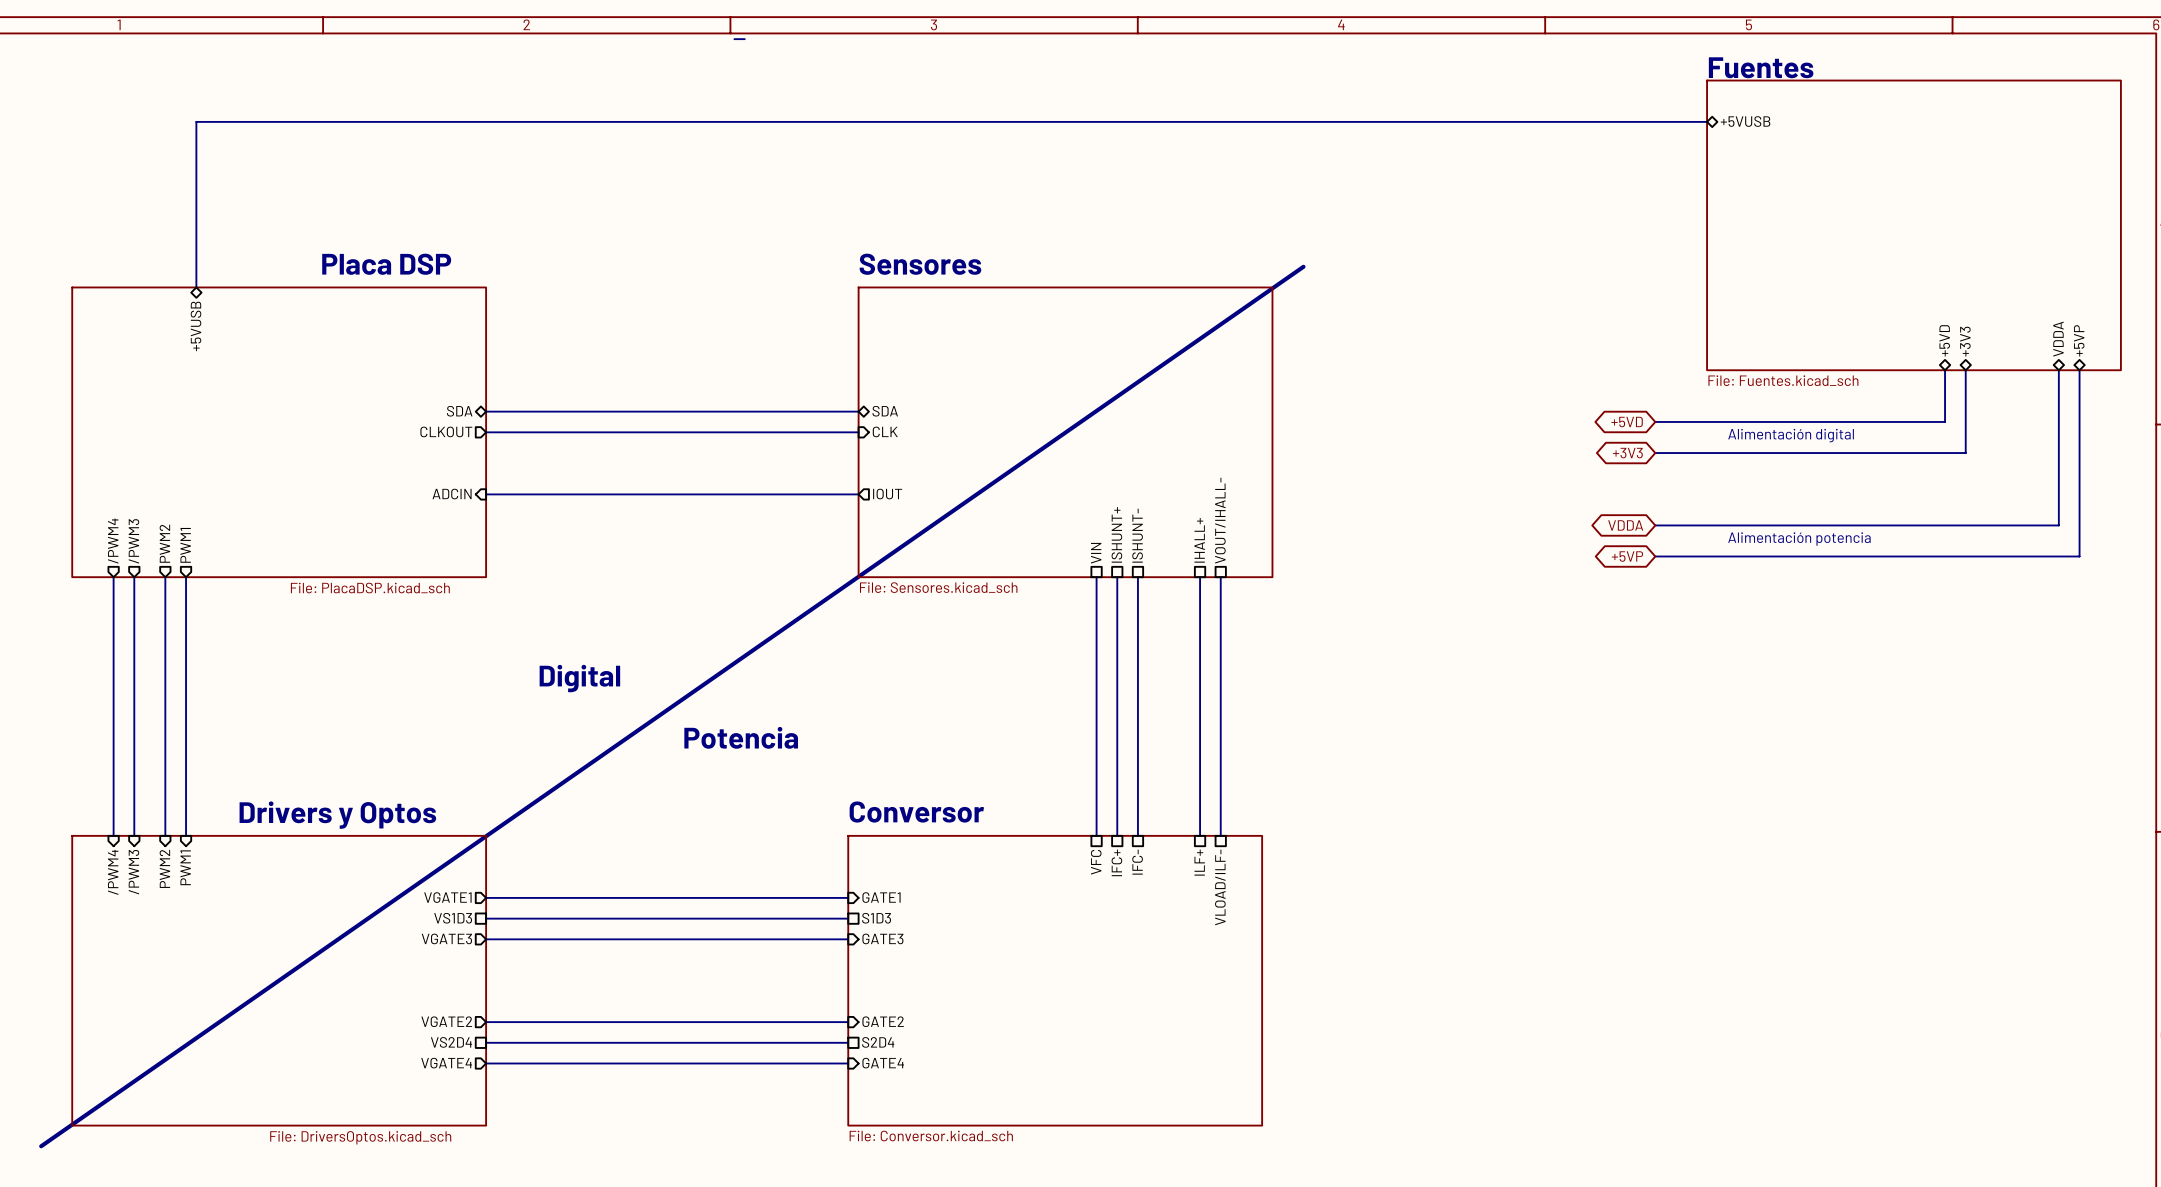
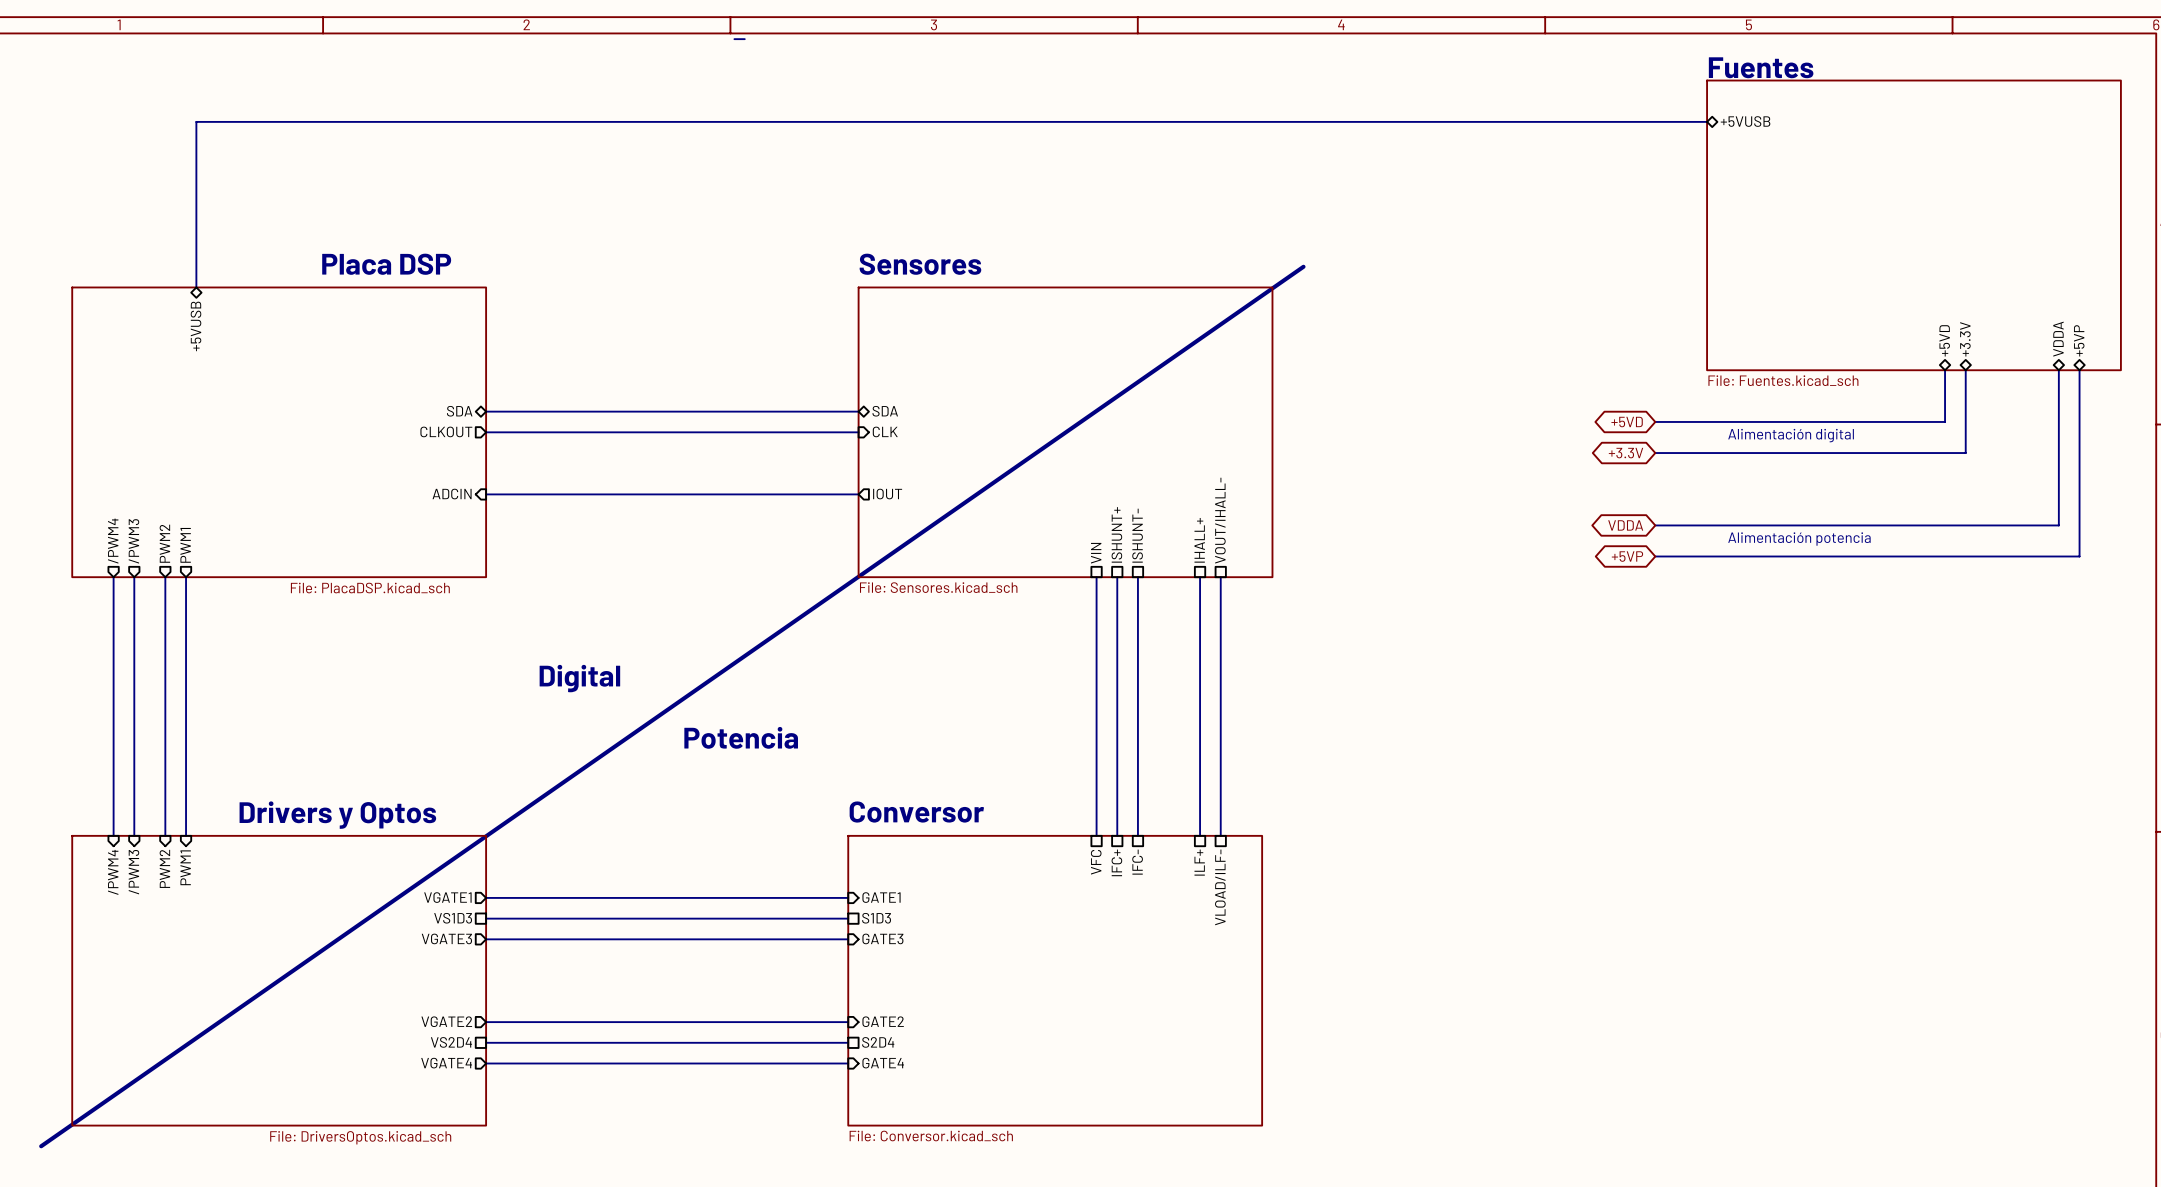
sheet pin: +3V3 (1965, 341) -> +3.3V (1965, 339)
global label: +3V3 (1627, 453) -> +3.3V (1626, 453)

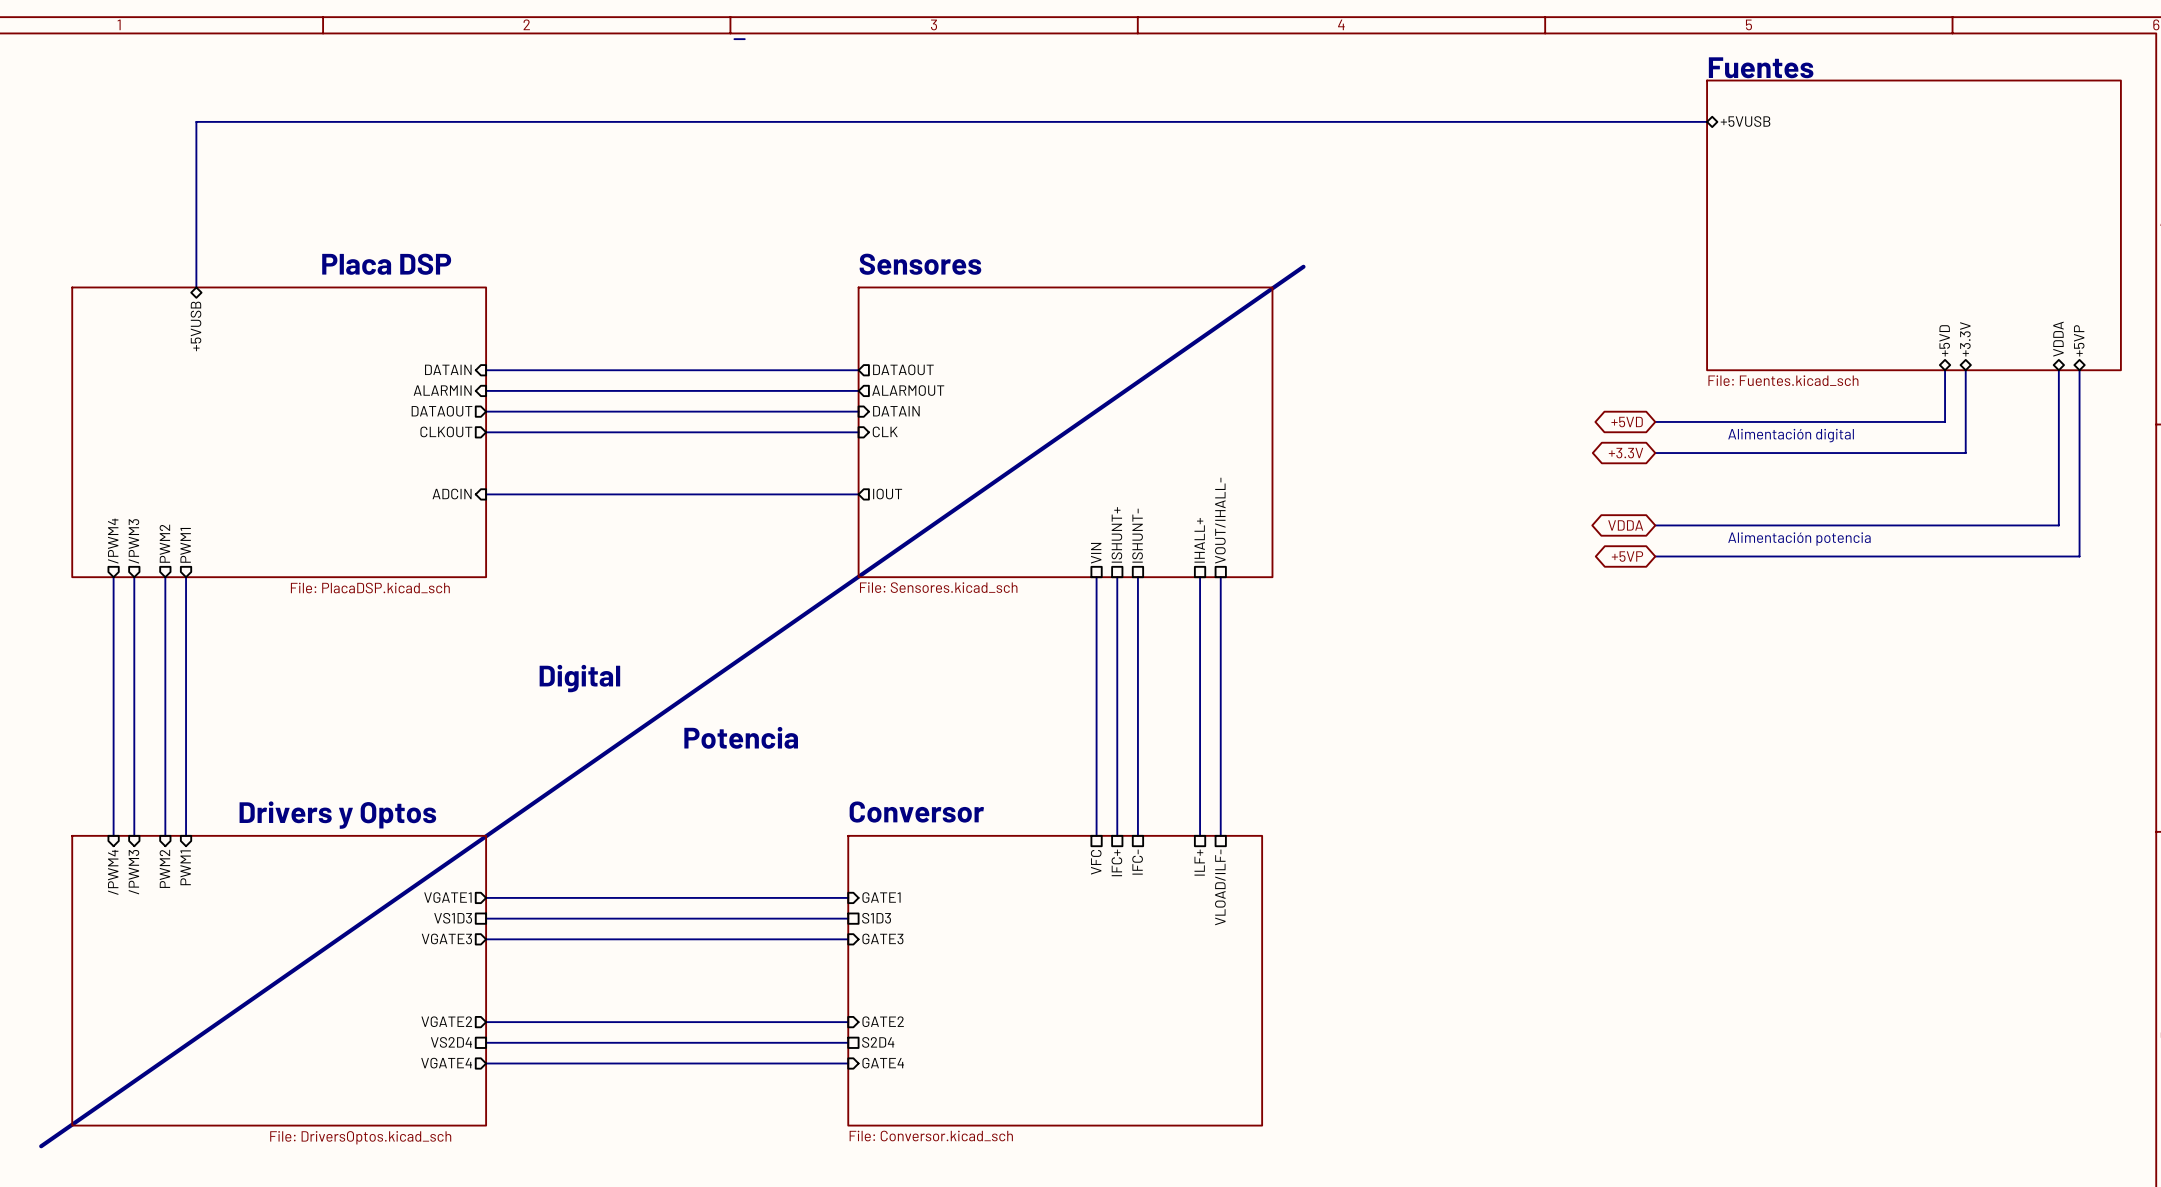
sheet pin: none -> DATAIN (448, 369)
sheet pin: none -> DATAOUT (903, 369)
wire: none -> (486, 370) (858, 370)
sheet pin: none -> ALARMIN (442, 390)
wire: none -> (486, 390) (858, 390)
sheet pin: none -> ALARMOUT (908, 390)
sheet pin shape: bidirectional (459, 411) -> output (442, 411)
sheet pin: SDA (459, 411) -> DATAOUT (442, 411)
sheet pin shape: bidirectional (885, 411) -> input (896, 411)
sheet pin: SDA (885, 411) -> DATAIN (896, 411)

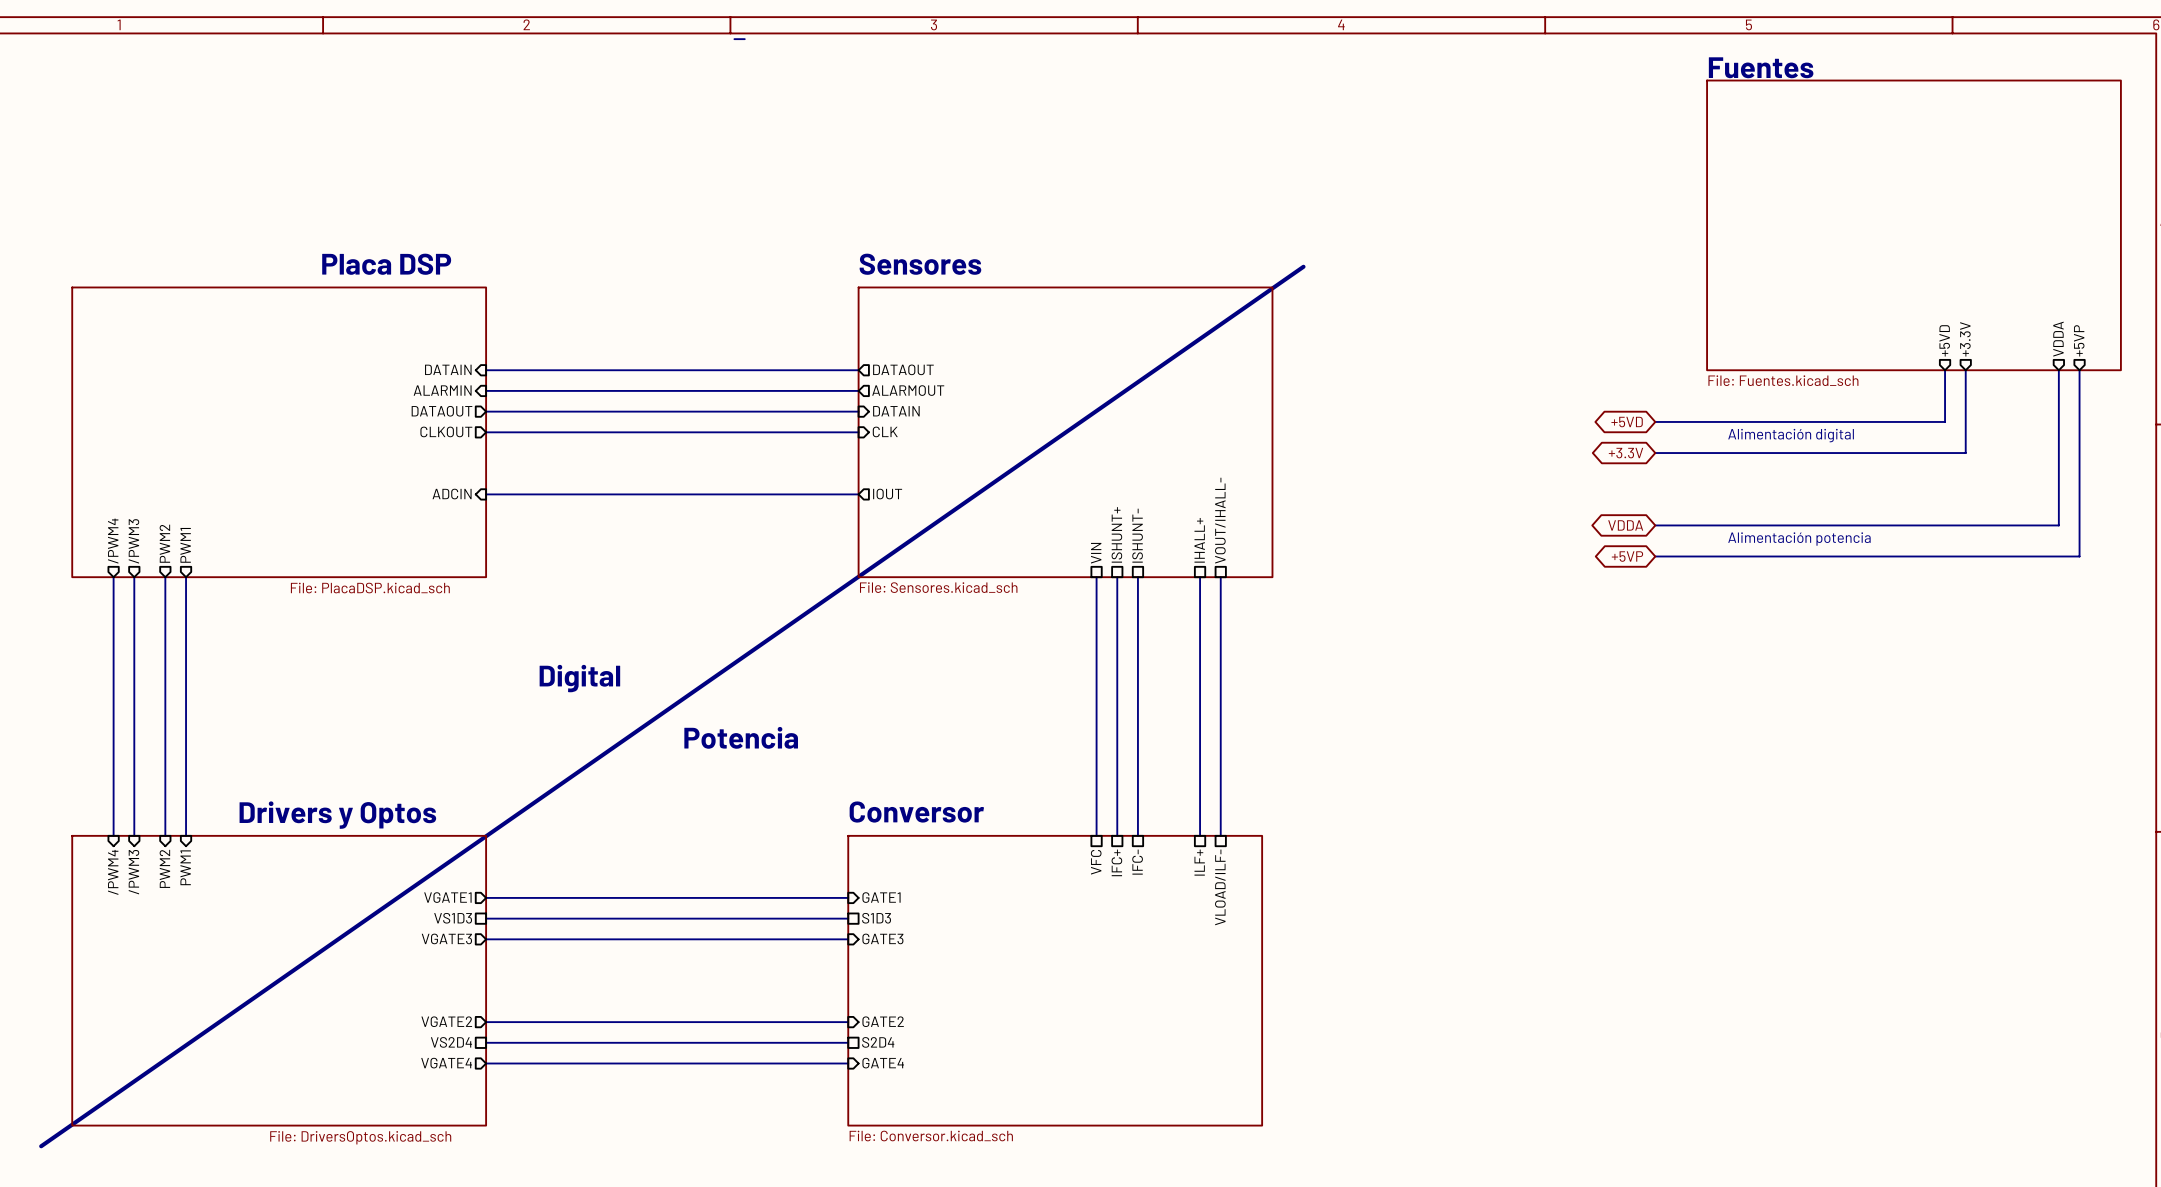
wire: (1707, 121) (196, 121) (196, 287) -> none
sheet pin: +5VUSB (1745, 121) -> none
sheet pin: +5VUSB (195, 326) -> none
sheet pin shape: bidirectional (1965, 339) -> output (1965, 339)
sheet pin shape: bidirectional (2058, 339) -> output (2058, 339)
sheet pin shape: bidirectional (1944, 340) -> output (1944, 340)
sheet pin shape: bidirectional (2079, 340) -> output (2079, 340)

